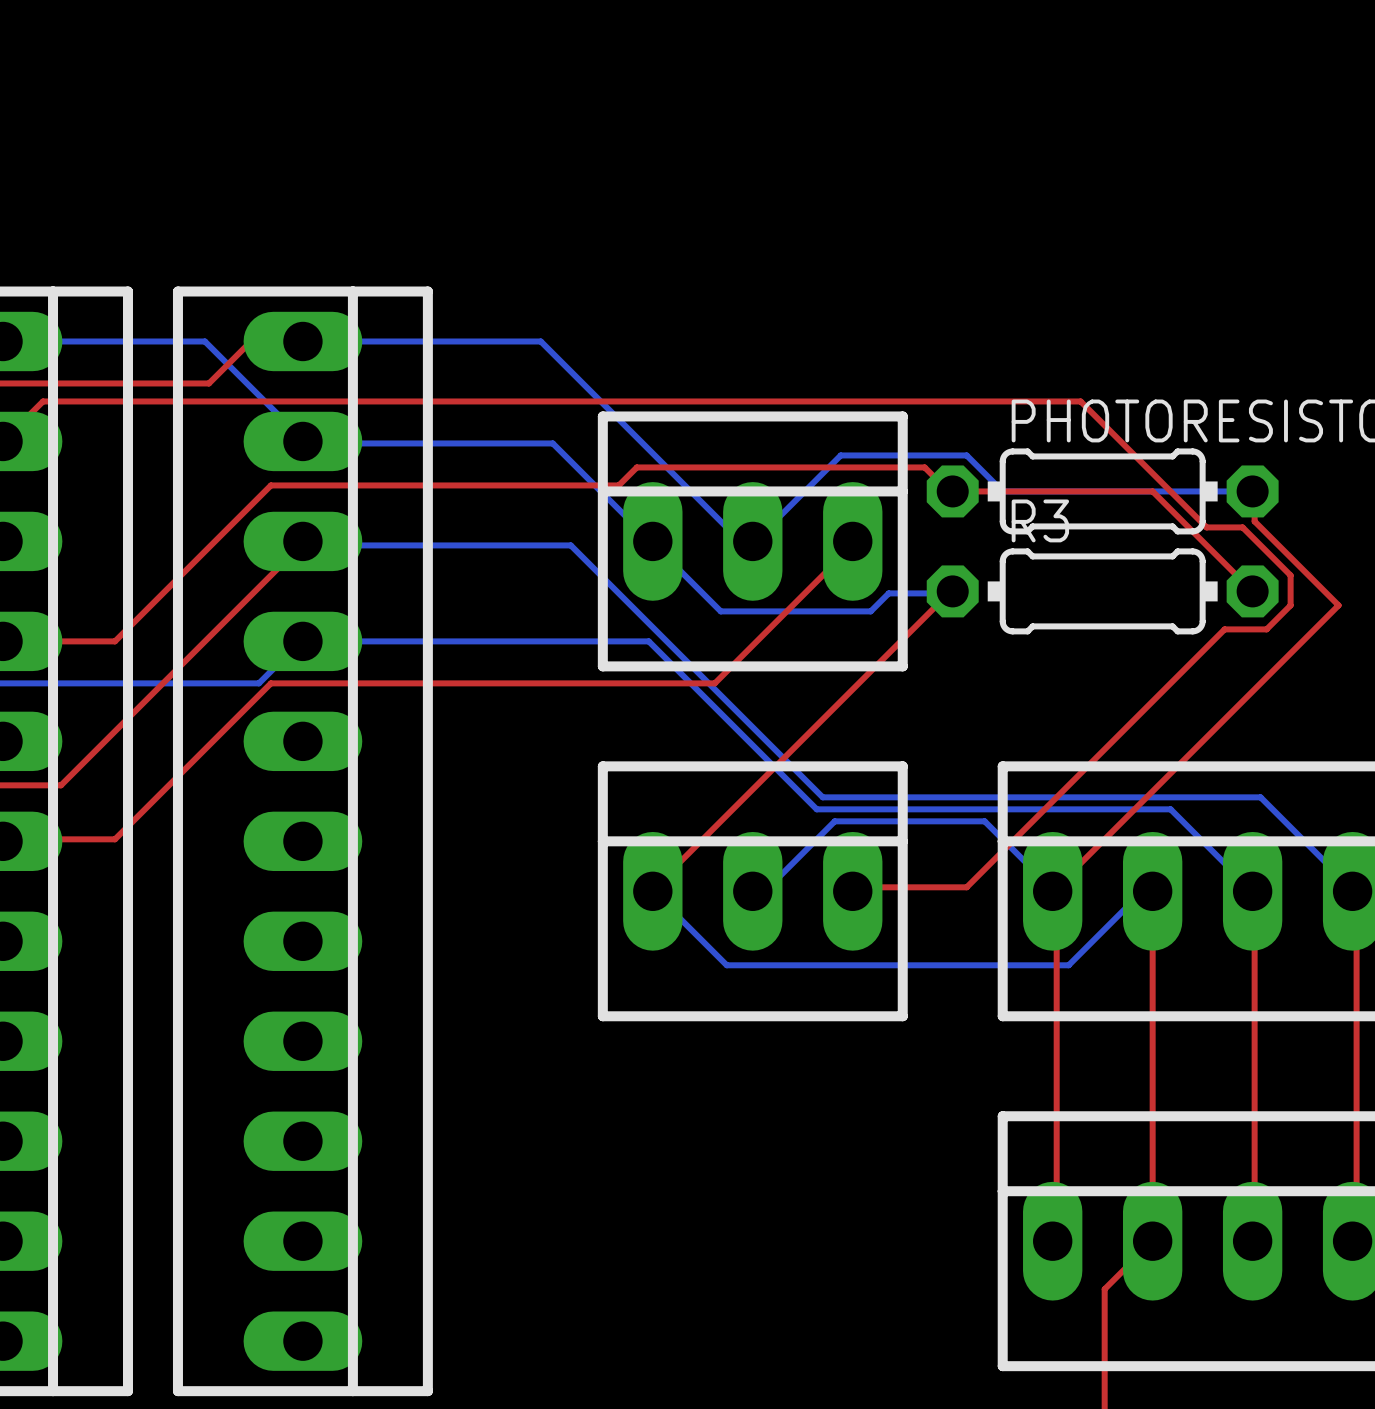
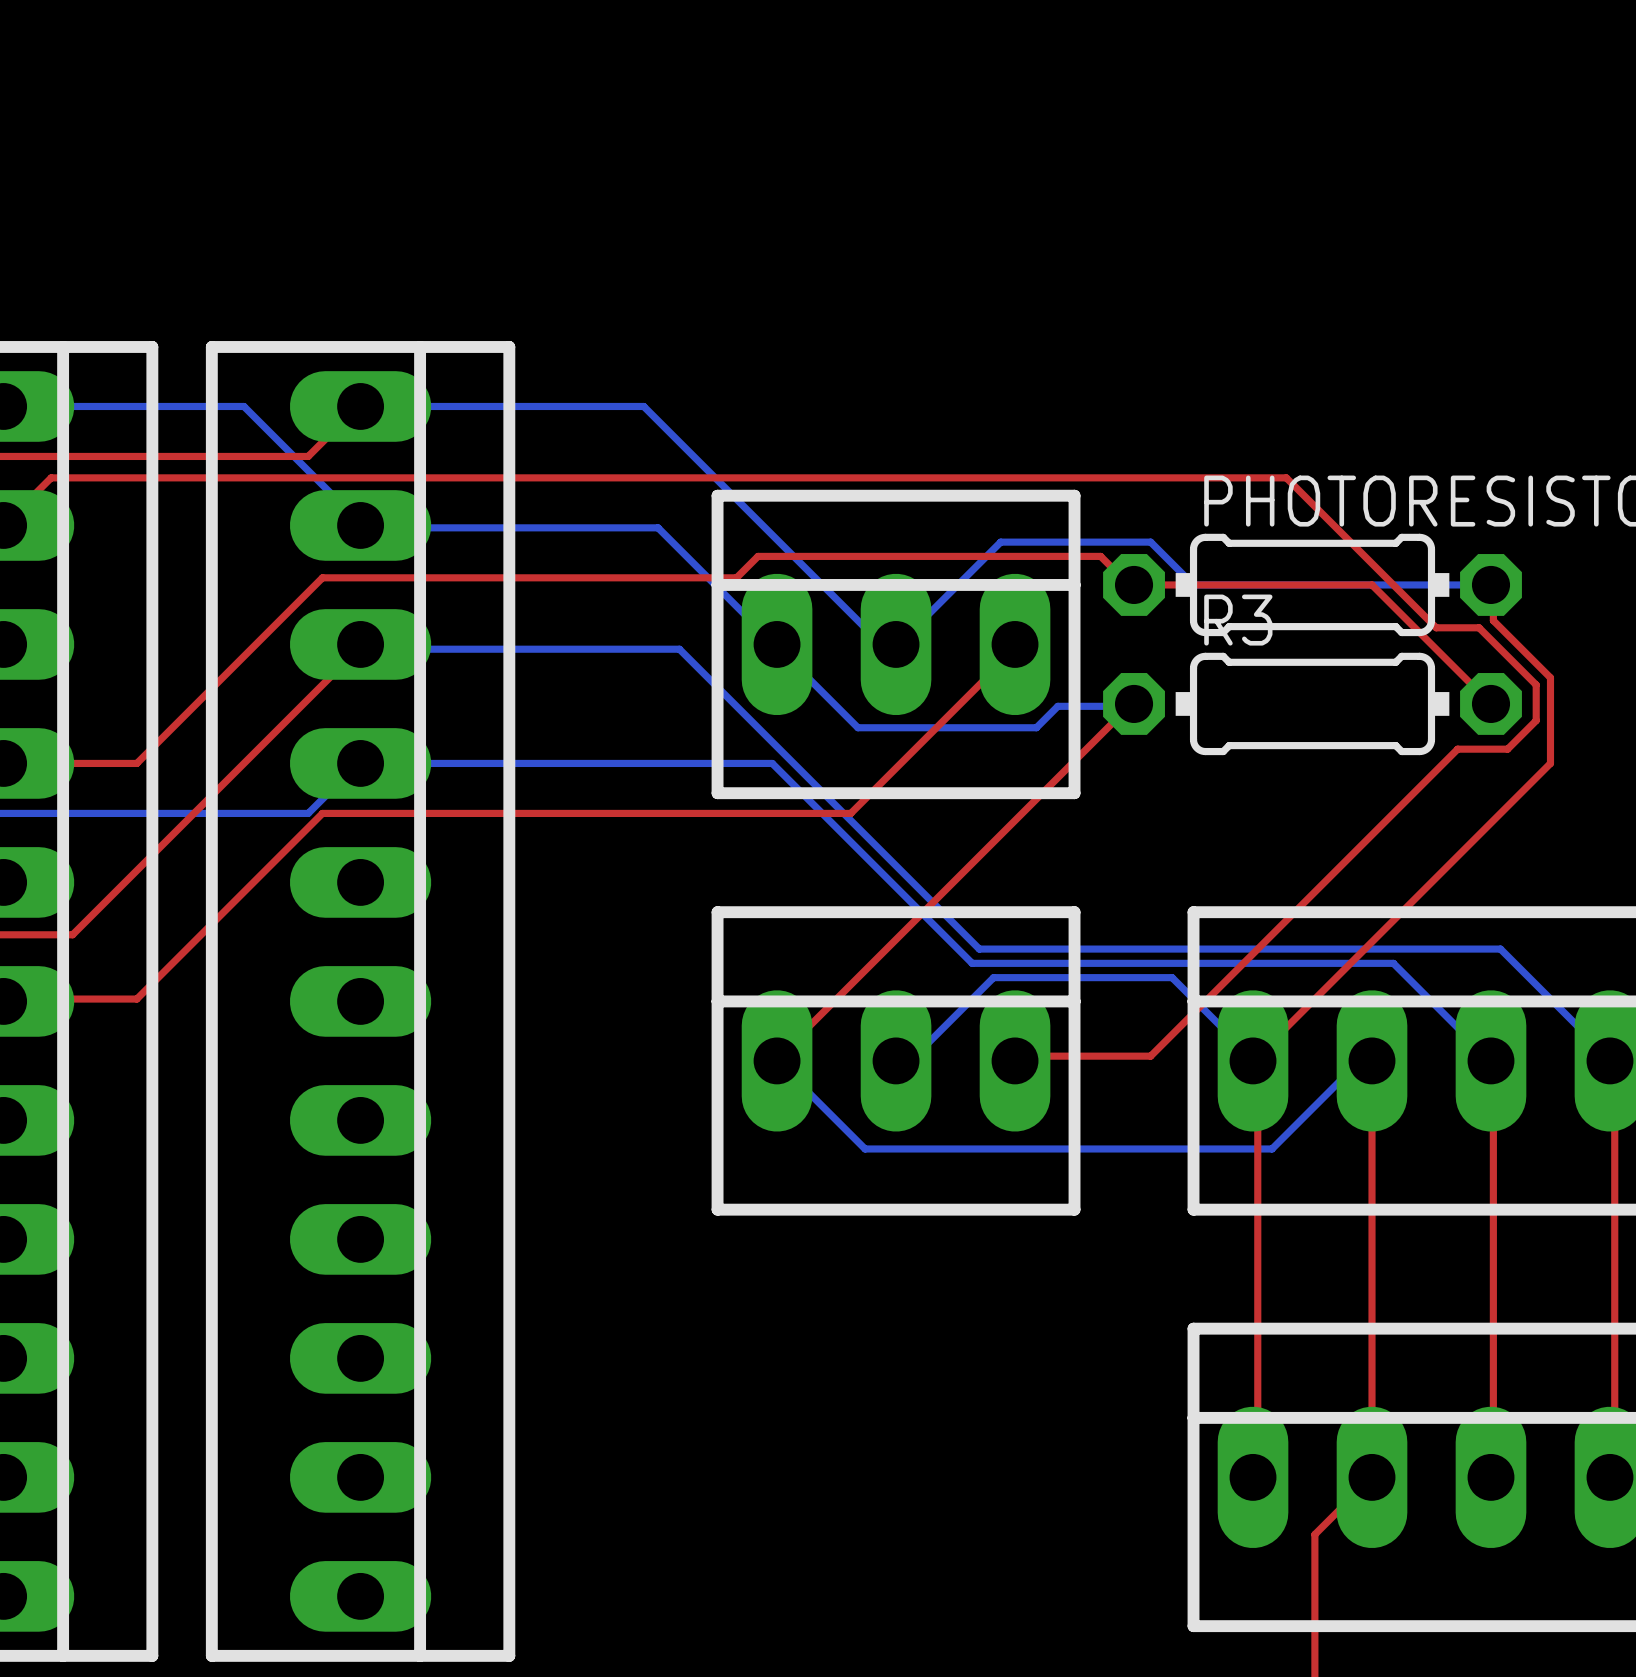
top track: (300, 341) (250, 341) (208, 383) -> (358, 406) (308, 456) (248, 456)
top track: (1302, 569) (1338, 605) (1302, 641) -> (1550, 677) (1550, 763)

